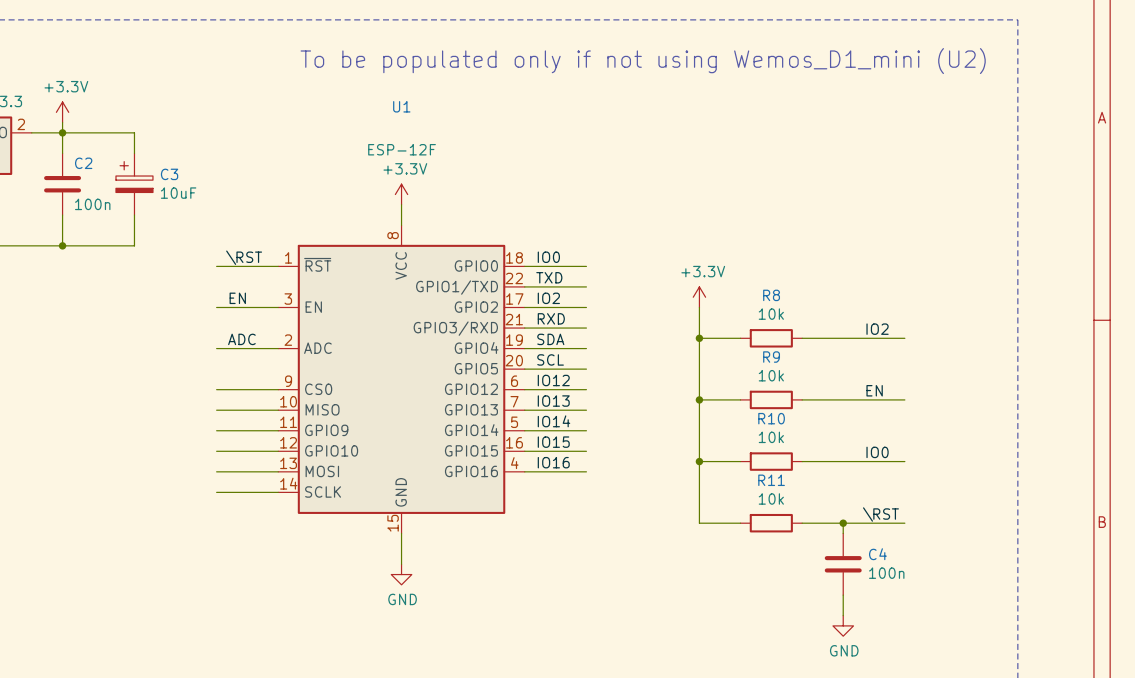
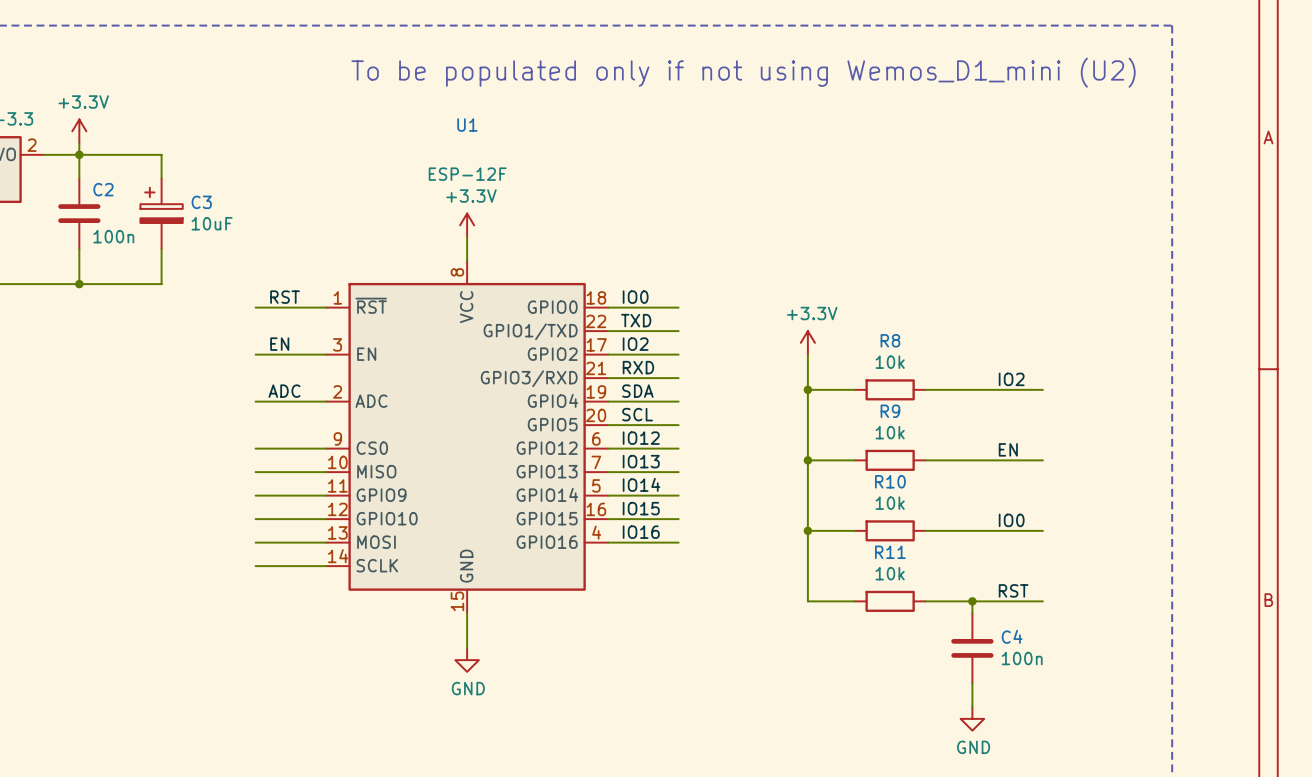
label: \RST (244, 257) -> RST (285, 297)
label: \RST (880, 514) -> RST (1013, 590)

